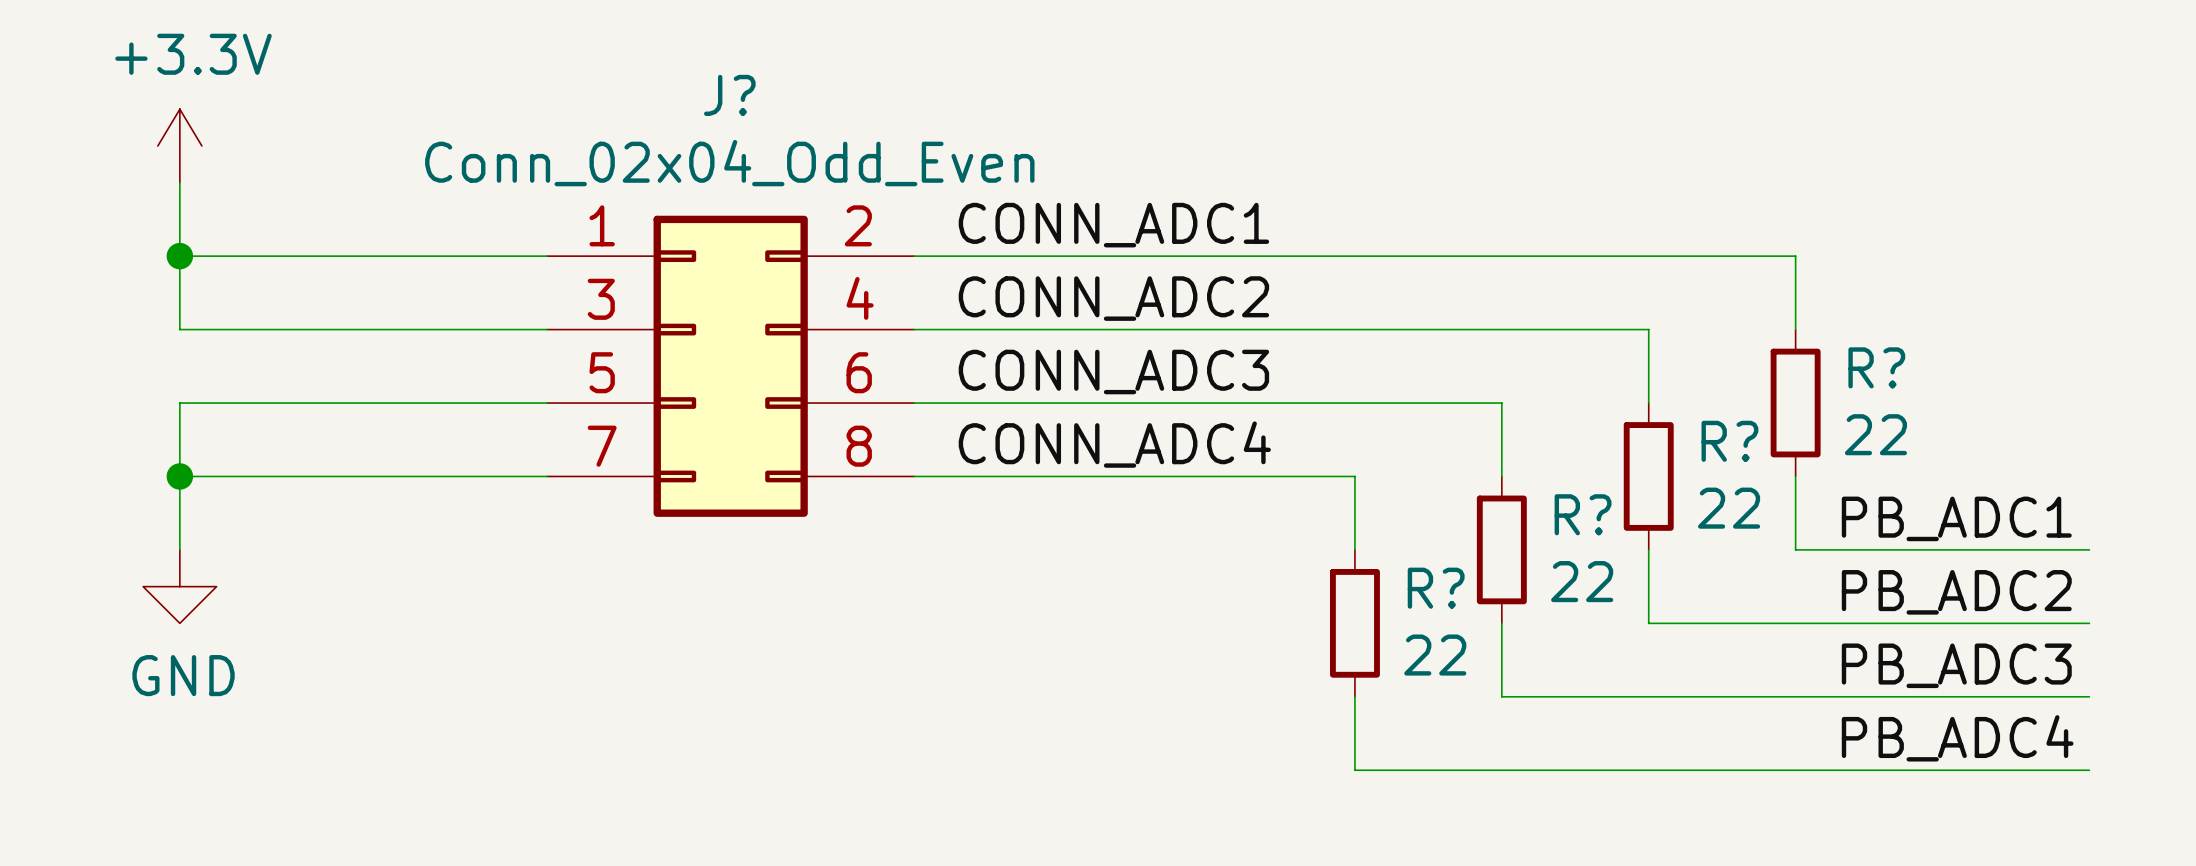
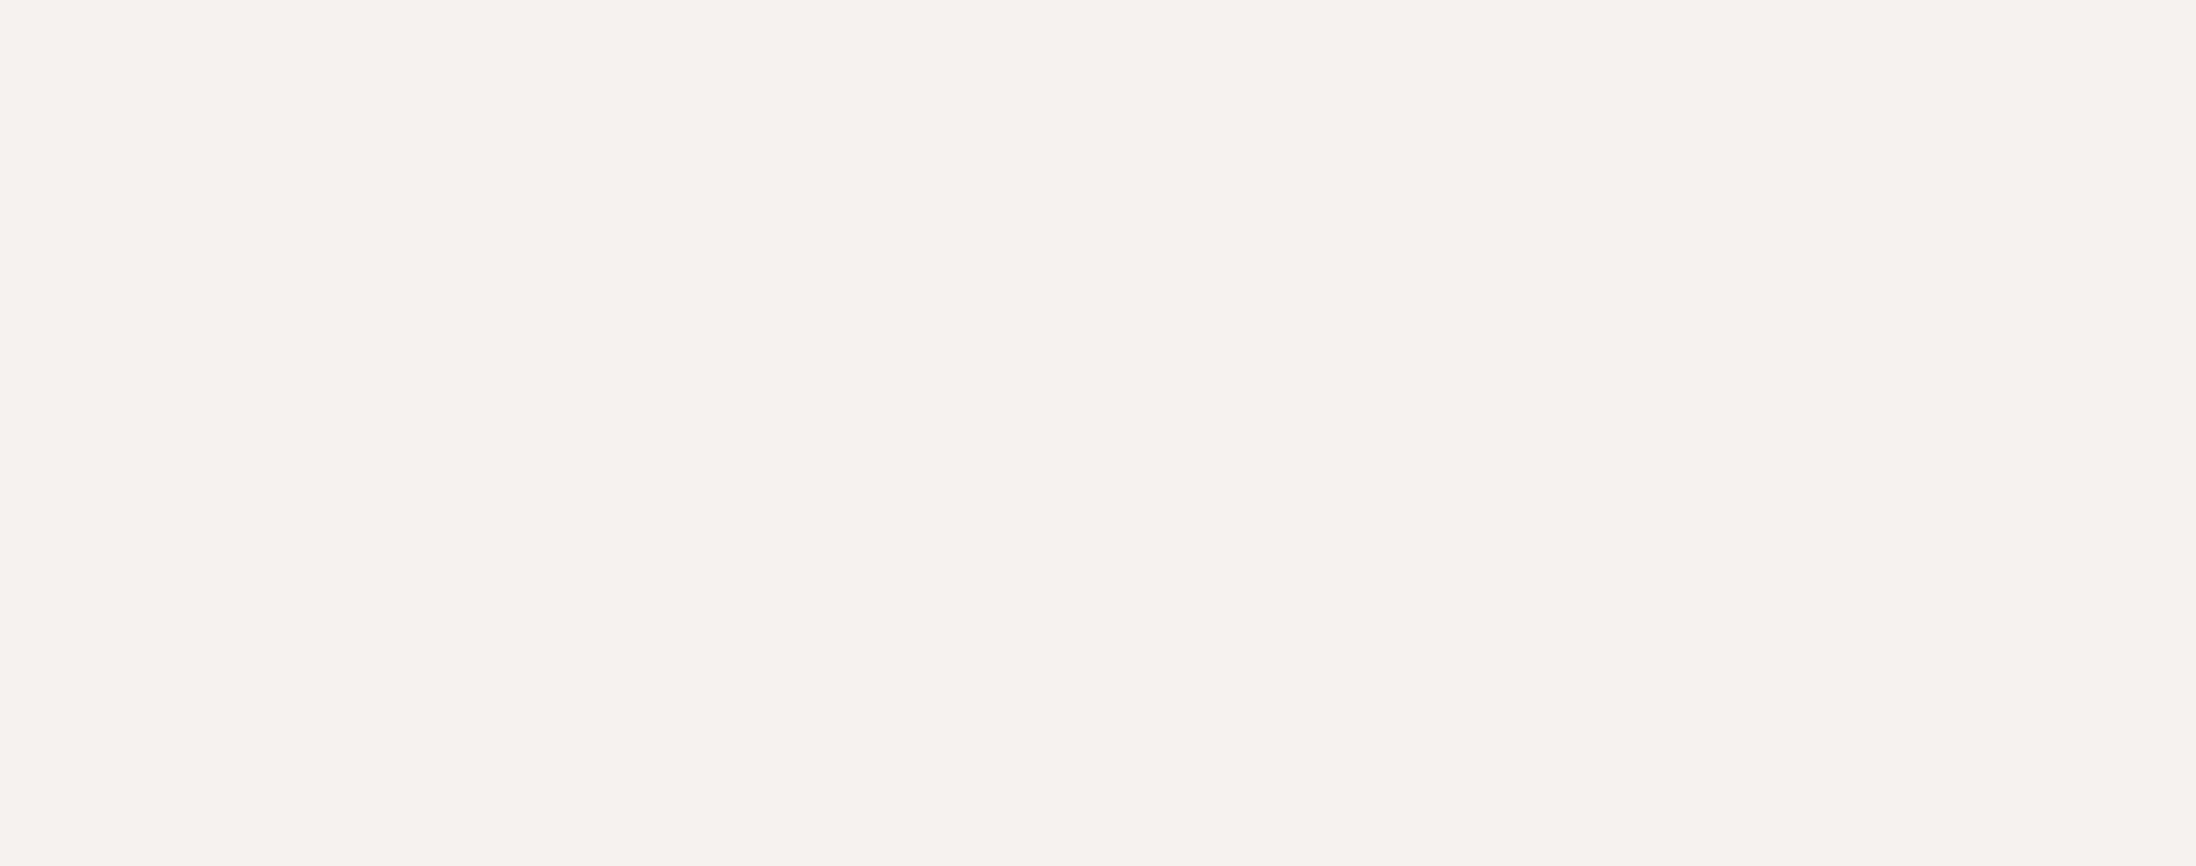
power symbol: +3.3V (179, 145) -> none
wire: (179, 182) (179, 329) (547, 329) -> none
label: CONN_ADC1 (1113, 225) -> none
wire: (179, 256) (547, 256) -> none
junction: (179, 256) -> none
wire: (914, 256) (1795, 256) (1795, 329) -> none
label: CONN_ADC2 (1113, 298) -> none
wire: (914, 329) (1648, 329) (1648, 403) -> none
J?: Conn_02x04_Odd_Even (730, 366) -> none
label: CONN_ADC3 (1113, 372) -> none
wire: (547, 403) (179, 403) (179, 549) -> none
wire: (914, 403) (1501, 403) (1501, 476) -> none
R?: 22 (1795, 403) -> none
label: CONN_ADC4 (1114, 444) -> none
wire: (179, 476) (547, 476) -> none
junction: (179, 476) -> none
wire: (914, 476) (1354, 476) (1354, 549) -> none
R?: 22 (1648, 476) -> none
wire: (1795, 476) (1795, 549) (2089, 549) -> none
label: PB_ADC1 (1956, 518) -> none
R?: 22 (1501, 549) -> none
wire: (1648, 549) (1648, 623) (2089, 623) -> none
power symbol: GND (179, 586) -> none
label: PB_ADC2 (1956, 592) -> none
R?: 22 (1354, 623) -> none
wire: (1501, 623) (1501, 696) (2089, 696) -> none
label: PB_ADC3 (1956, 665) -> none
wire: (1354, 696) (1354, 770) (2089, 770) -> none
label: PB_ADC4 (1957, 738) -> none

